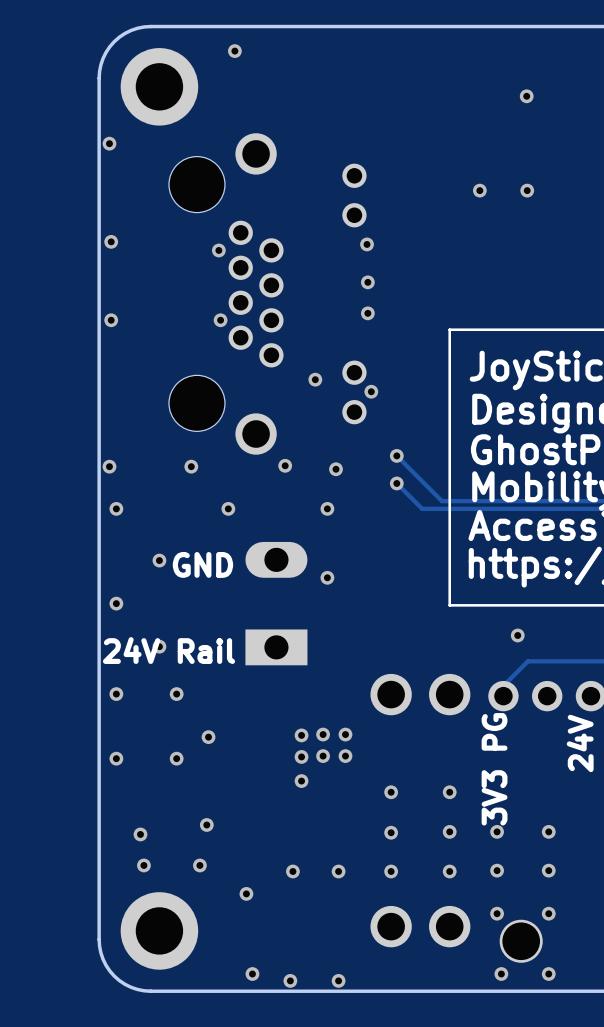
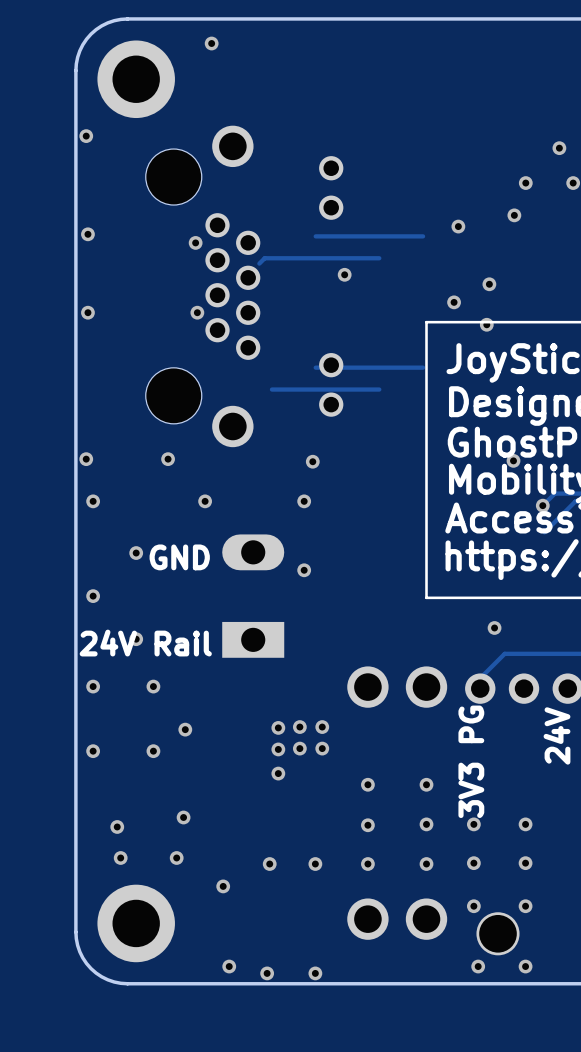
via: (526, 96) -> none
via: none -> (559, 148)
via: (479, 190) -> none
via: (527, 190) -> none
via: none -> (525, 183)
via: none -> (573, 183)
via: none -> (514, 215)
via: none -> (458, 226)
track: none -> (423, 236) (315, 236)
via: (367, 244) -> none
track: none -> (379, 258) (264, 258) (259, 263)
via: none -> (489, 284)
via: none -> (454, 302)
via: (367, 313) -> none
via: none -> (486, 324)
track: none -> (423, 367) (315, 367)
via: (315, 379) -> none
via: (371, 391) -> none
track: none -> (379, 389) (271, 389)
track: (396, 455) (442, 501) (578, 501) -> (542, 505) (554, 493)
via: (396, 455) -> none
via: (285, 465) -> none
via: none -> (513, 460)
track: (396, 483) (422, 508) (598, 508) -> (544, 532) (575, 501)
via: (396, 483) -> none
via: none -> (542, 505)

